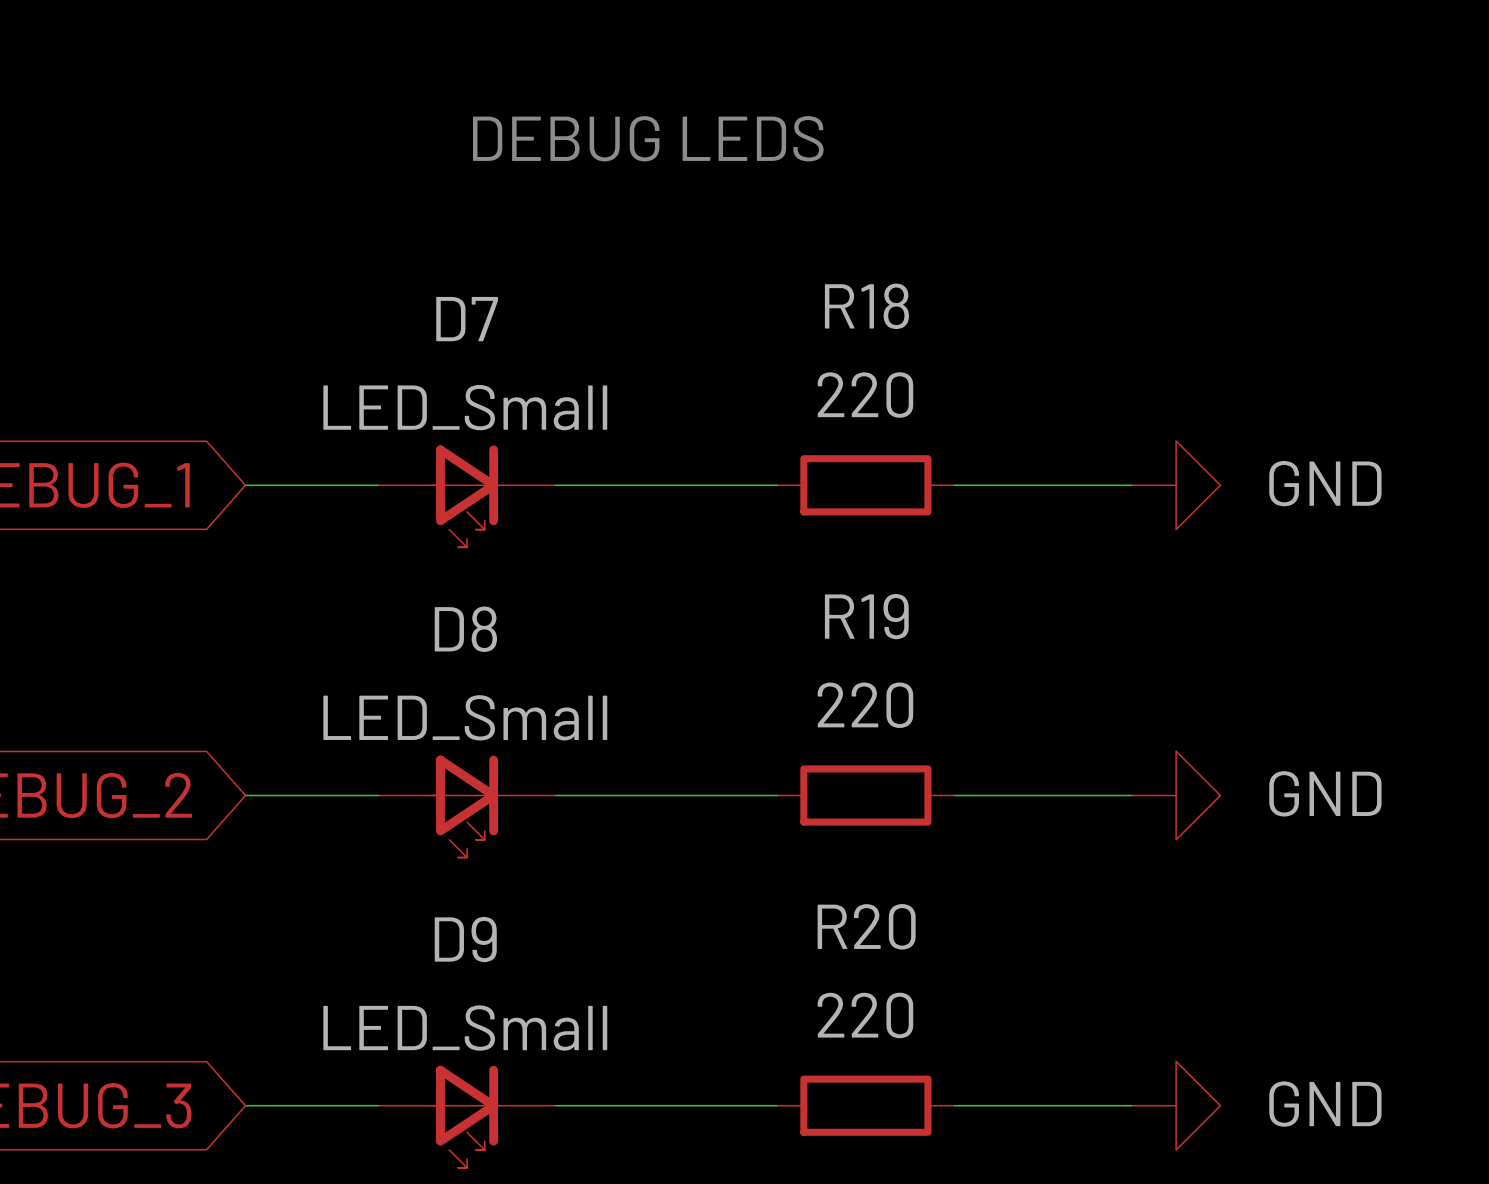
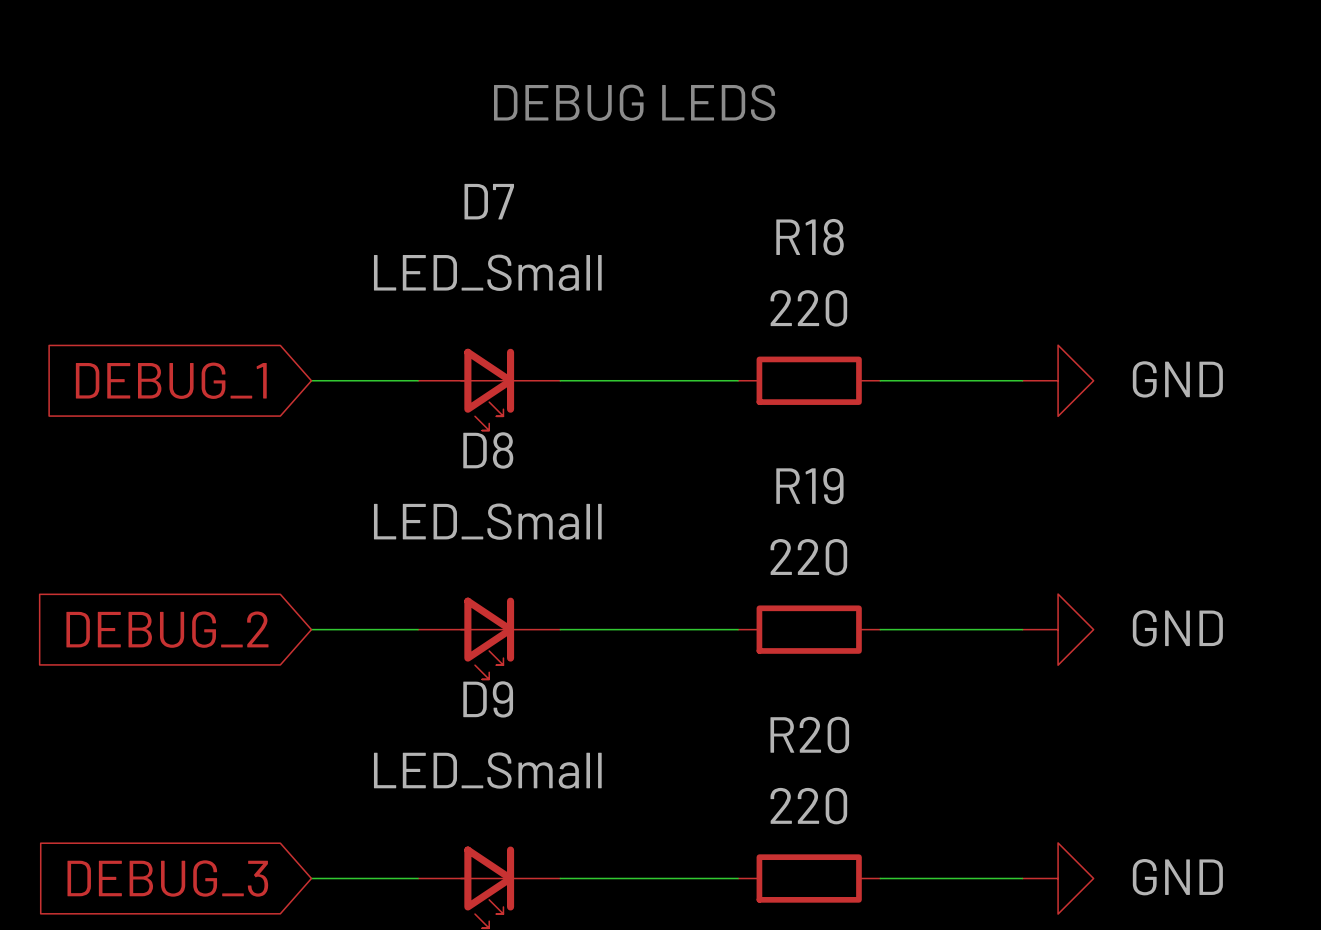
D7 name position: D7 (467, 319) -> D7 (489, 201)
D7 value position: LED_Small (465, 407) -> LED_Small (487, 272)
D8 name position: D8 (465, 629) -> D8 (488, 450)
D8 value position: LED_Small (465, 717) -> LED_Small (487, 521)
D9 name position: D9 (465, 939) -> D9 (488, 699)
D9 value position: LED_Small (465, 1028) -> LED_Small (487, 770)

